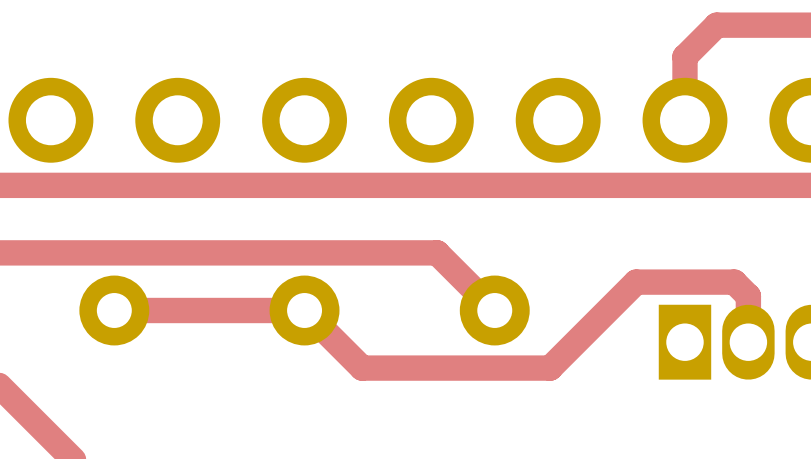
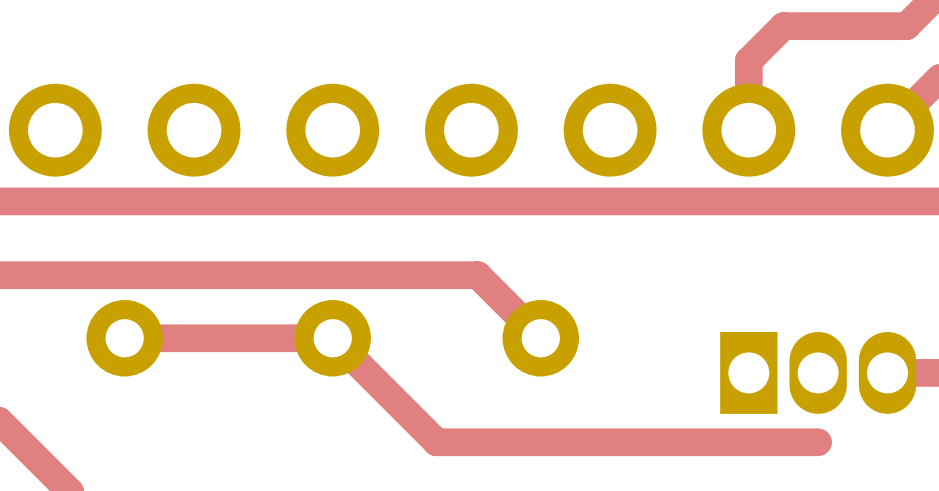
top track: (748, 342) (748, 296) (734, 282) (636, 282) (550, 368) (362, 368) -> (818, 442) (436, 442) (395, 401)

